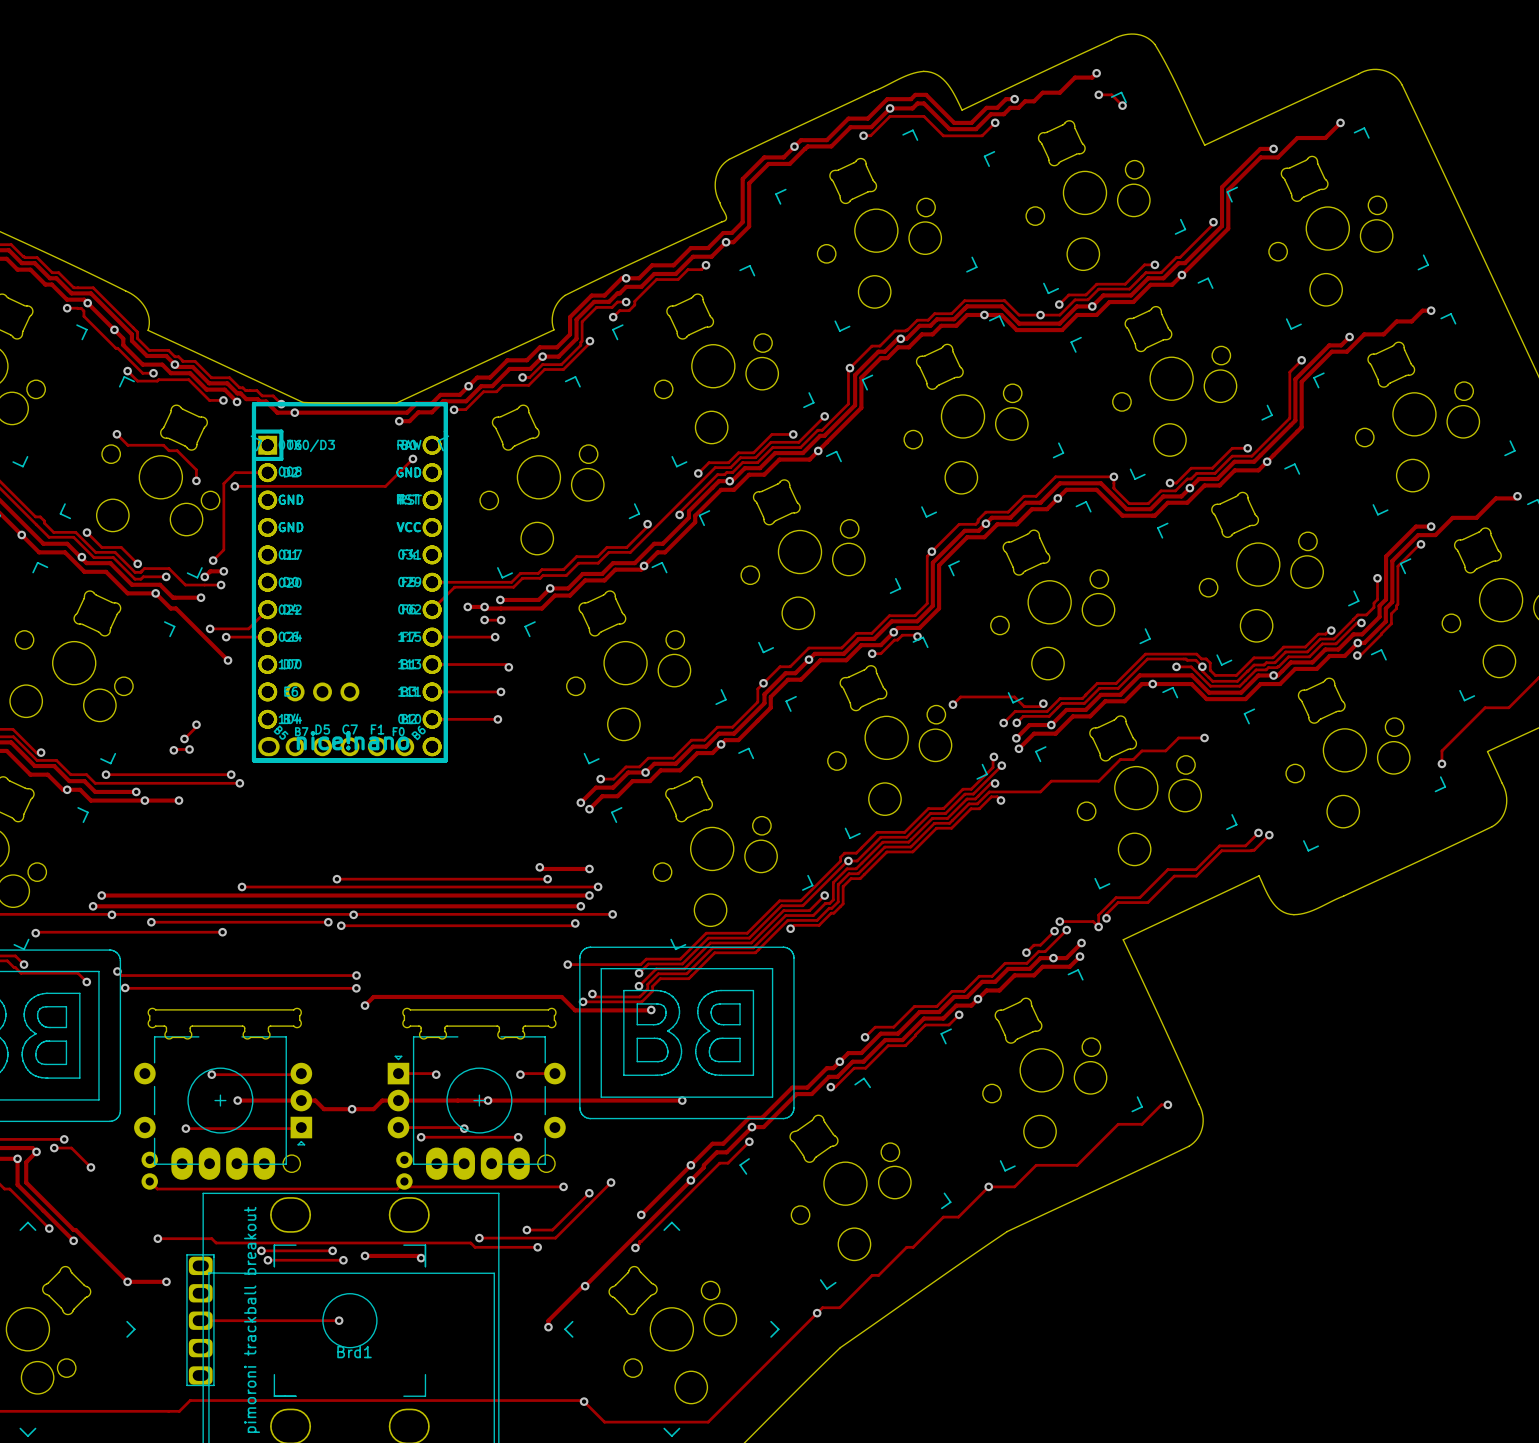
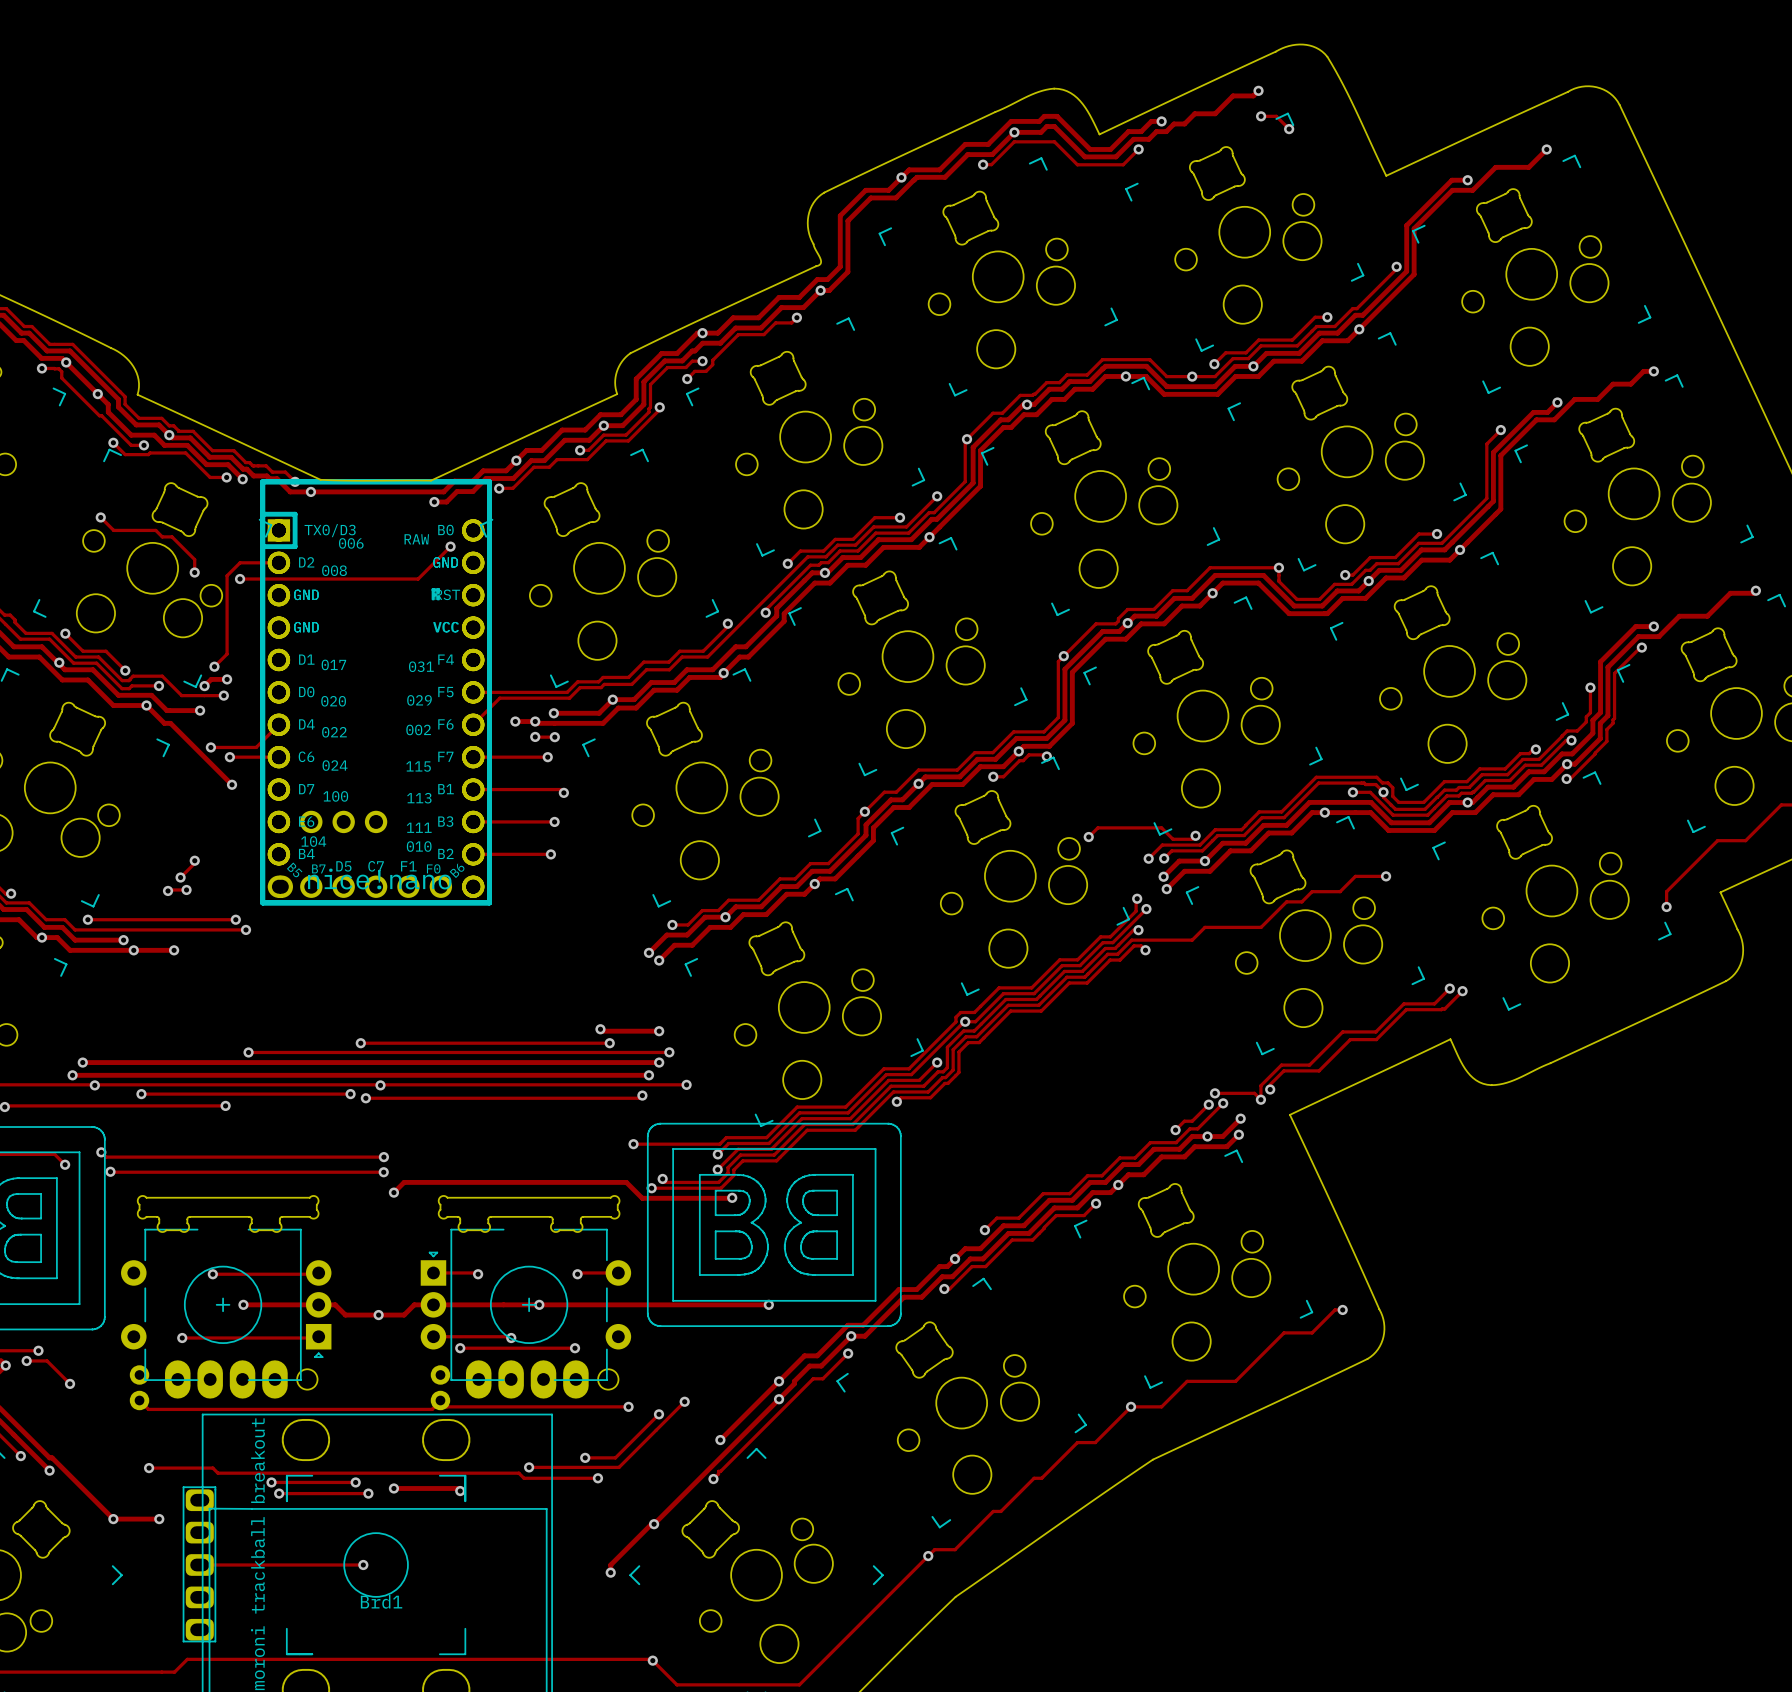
part: (349, 582) -> none
part: (349, 582) -> none
part: none -> (376, 692)
part: none -> (376, 692)

